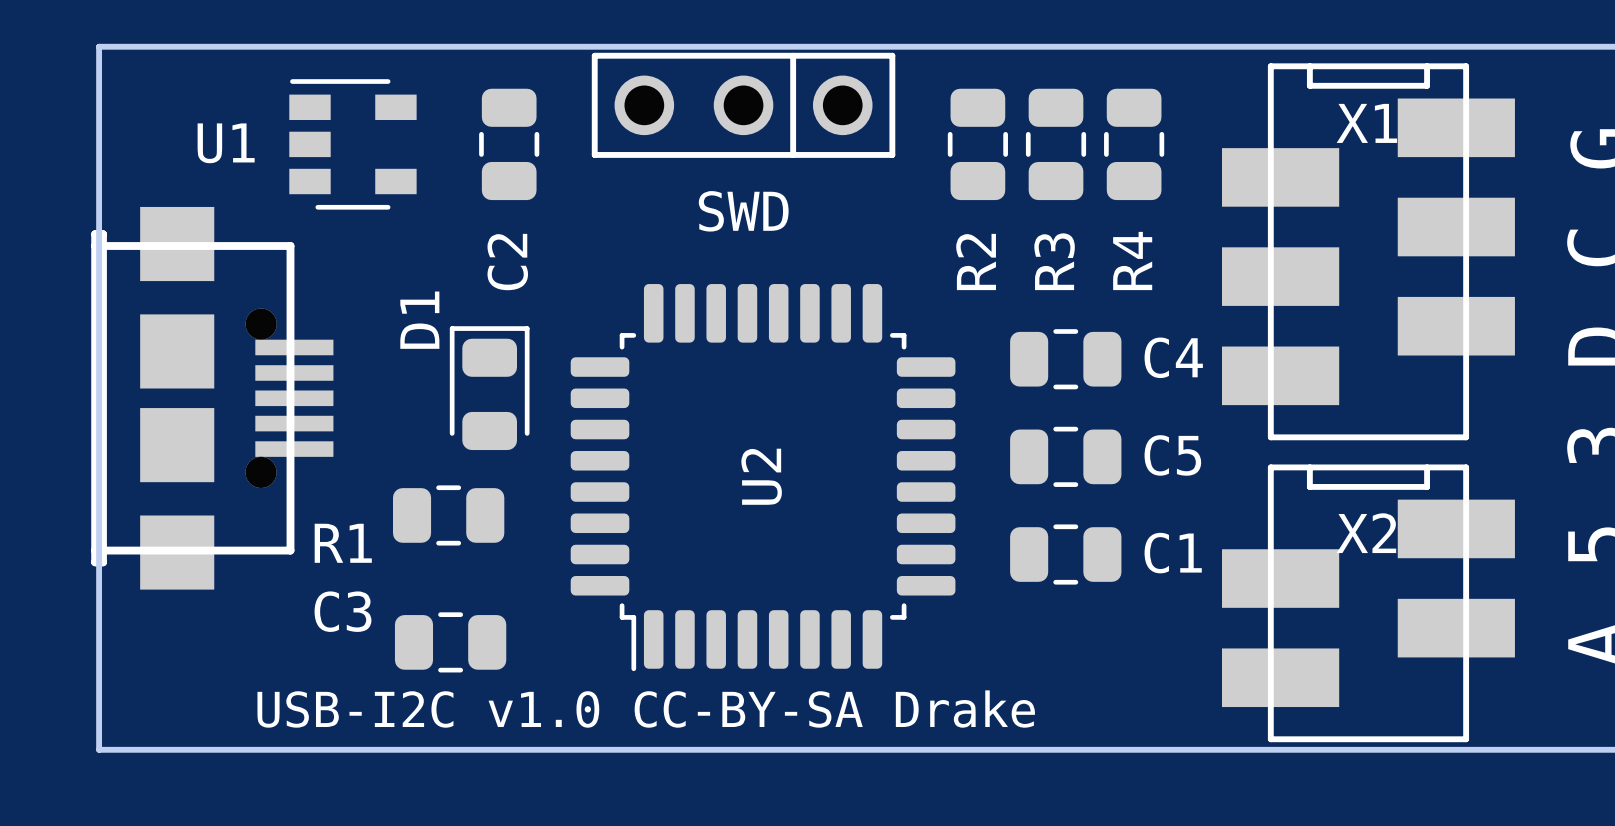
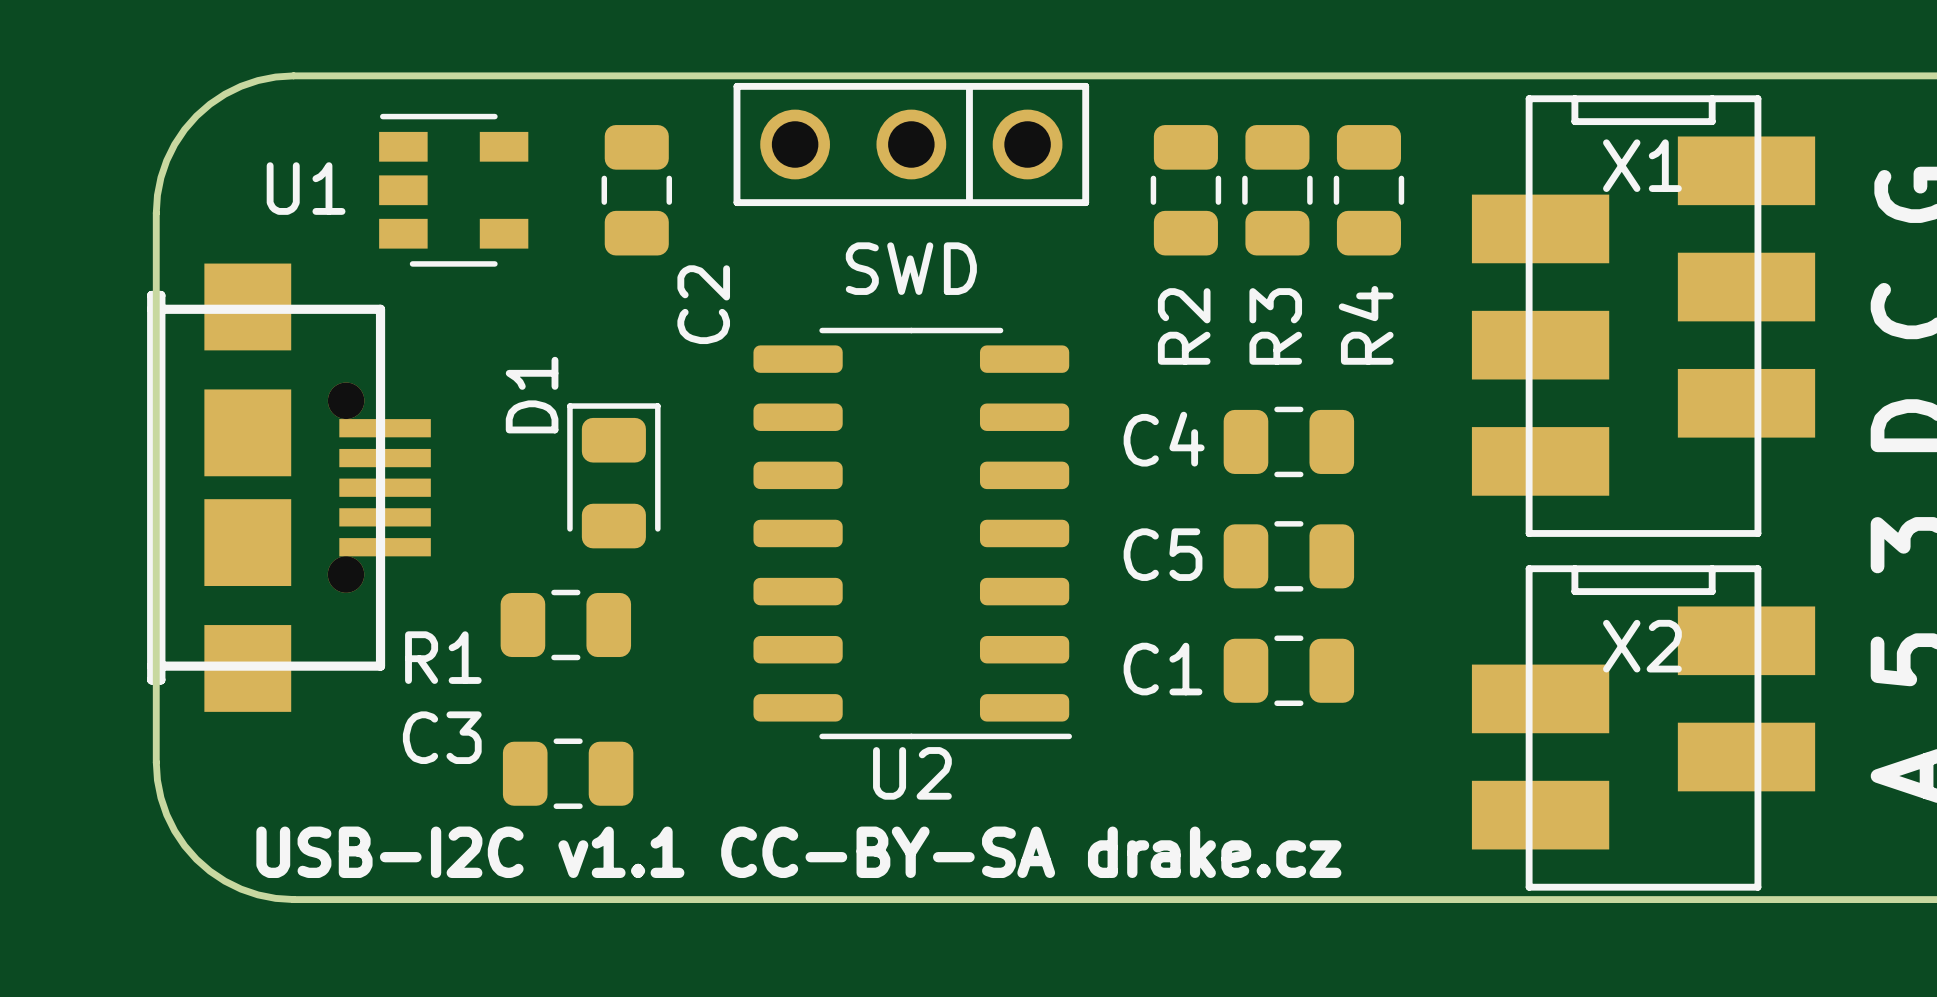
board edge: (216, 46) (99, 46) (99, 163) -> (293, 75) (275, 77) (241, 86) (209, 104) (196, 116) (184, 129) (166, 160) (157, 195) (156, 213)
C2 name position: C2 (507, 262) -> C2 (703, 304)
U2 footprint: [570, 284, 956, 672] -> [753, 327, 1072, 740]
C4 name position: C4 (1173, 357) -> C4 (1164, 439)
C5 name position: C5 (1172, 455) -> C5 (1163, 554)
U2 name position: U2 (761, 476) -> U2 (912, 773)
C1 name position: C1 (1173, 553) -> C1 (1163, 669)
board edge: (99, 632) (99, 749) (216, 749) -> (156, 762) (157, 780) (166, 814) (184, 845) (196, 859) (209, 871) (241, 889) (275, 898) (293, 899)
text: USB-I2C v1.0 CC-BY-SA Drake (646, 709) -> USB-I2C v1.1 CC-BY-SA drake.cz (798, 852)

